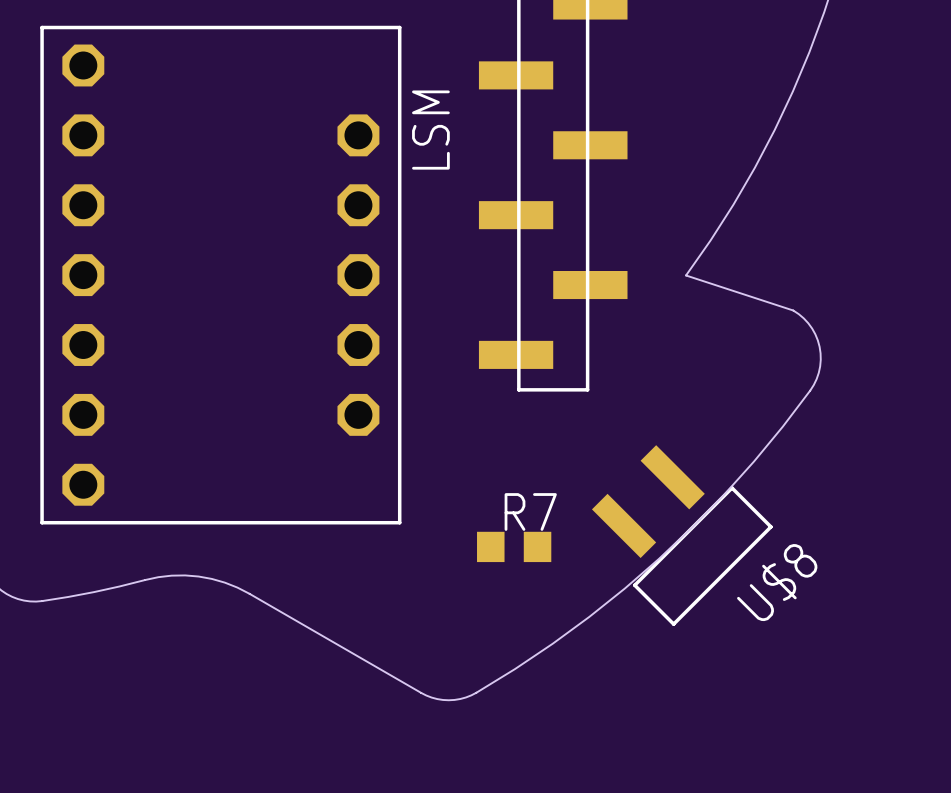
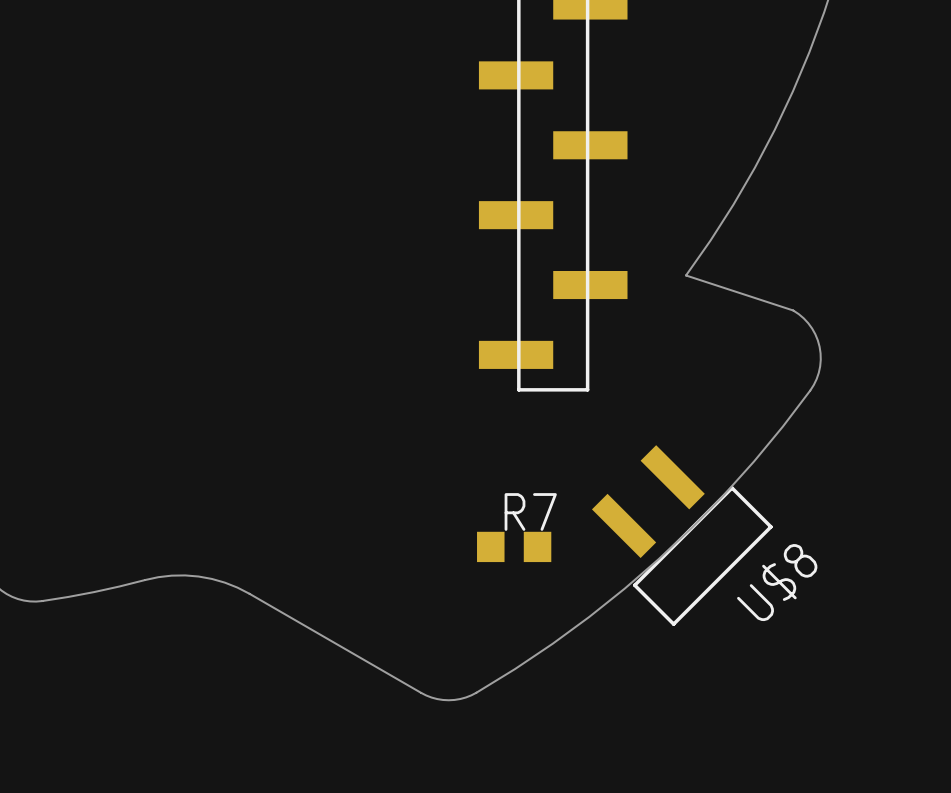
LSM: (220, 275) -> none

